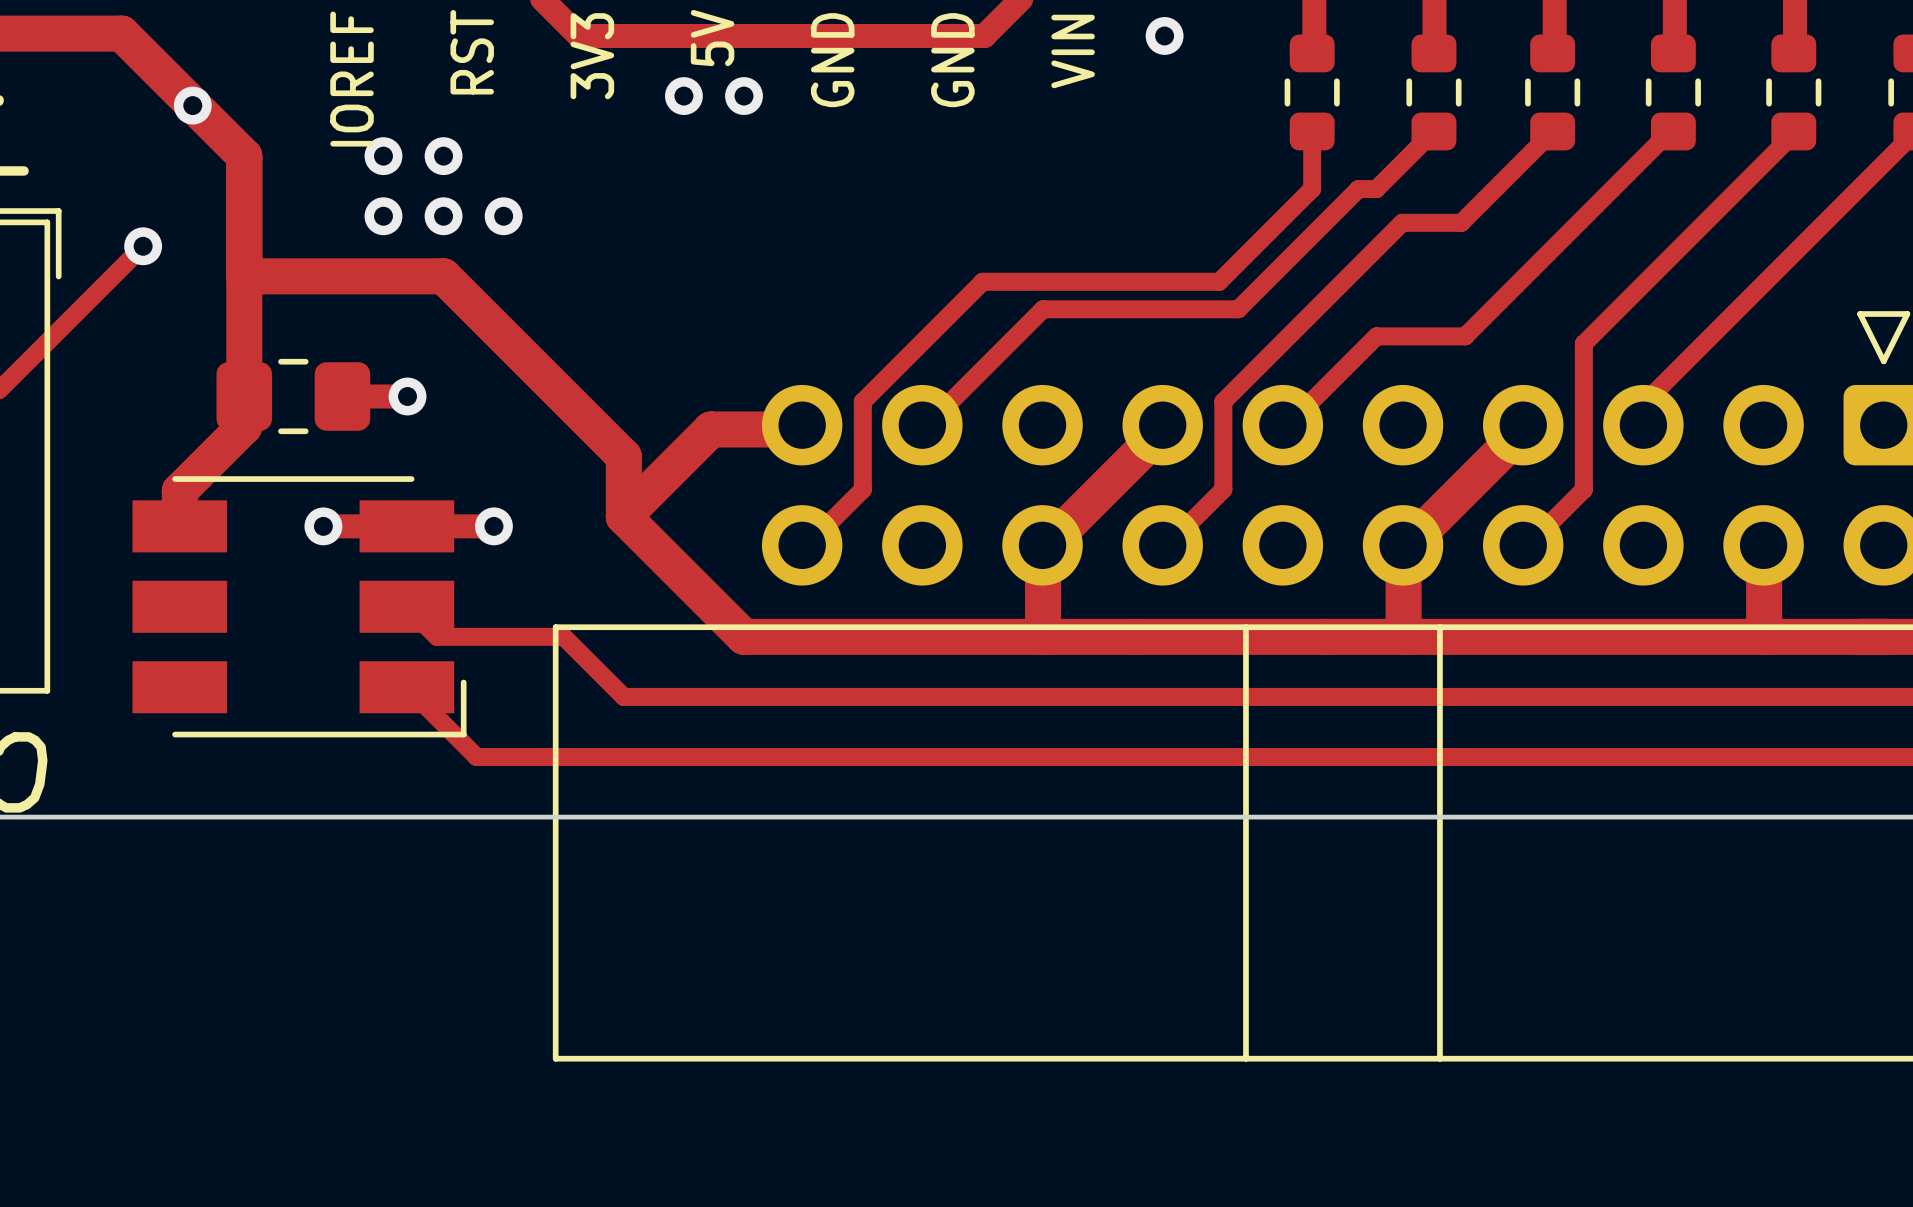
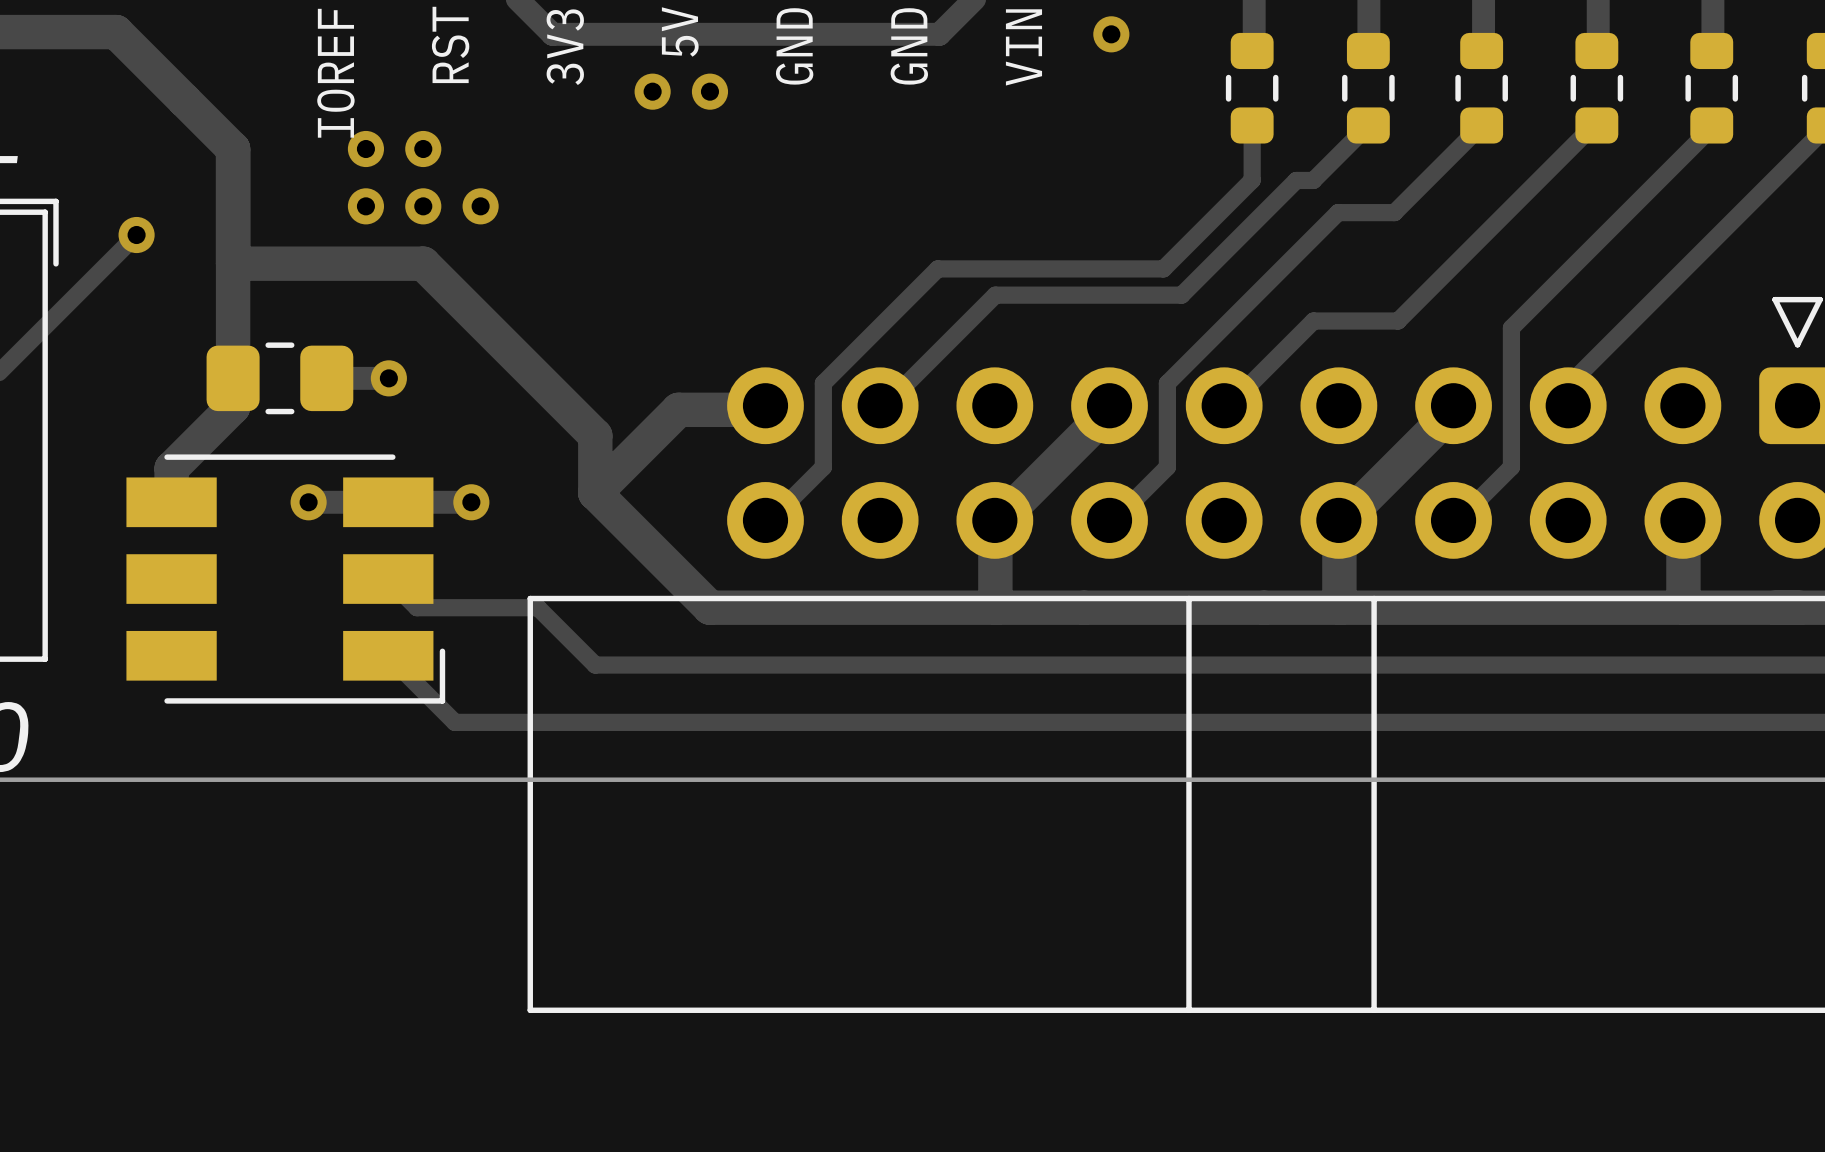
via: (192, 105) -> none

